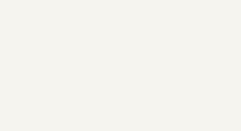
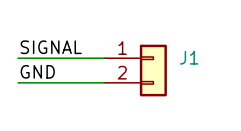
label: none -> SIGNAL (51, 47)
wire: none -> (18, 58) (104, 58)
J1: none -> (135, 70)
label: none -> GND (37, 71)
wire: none -> (18, 82) (104, 82)

